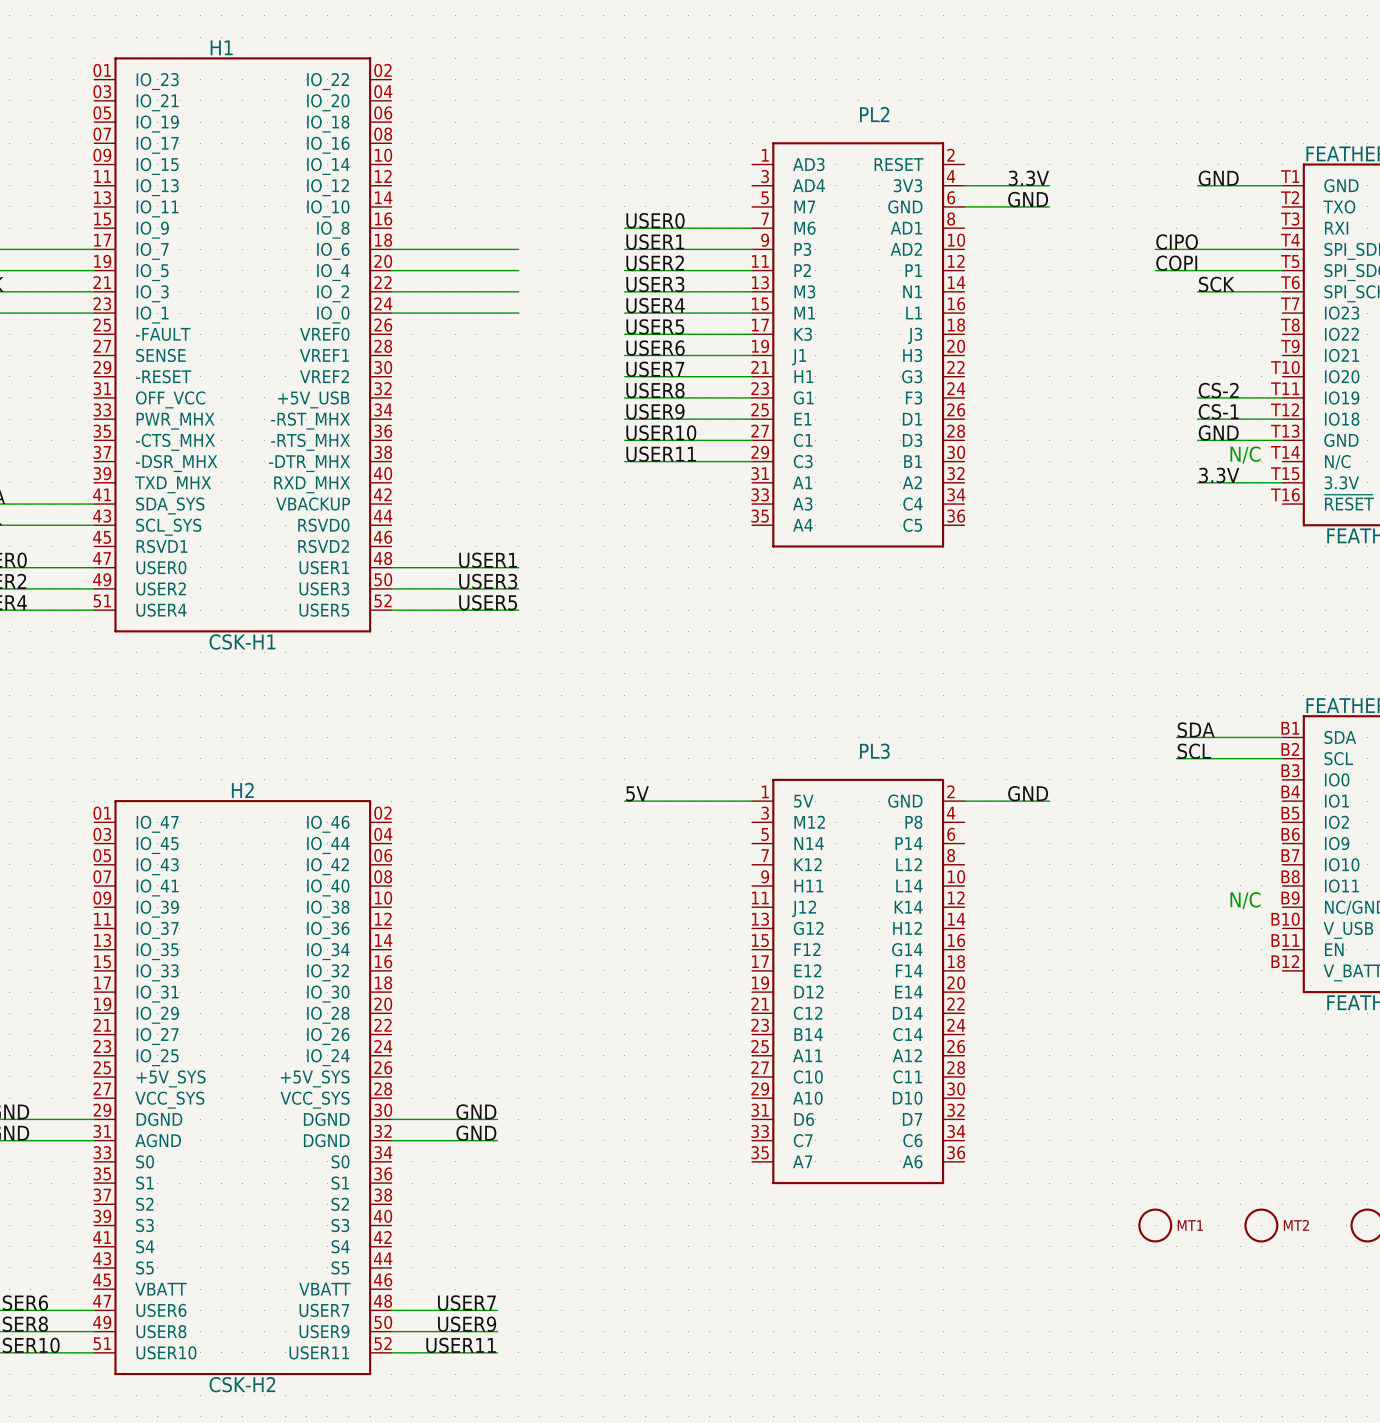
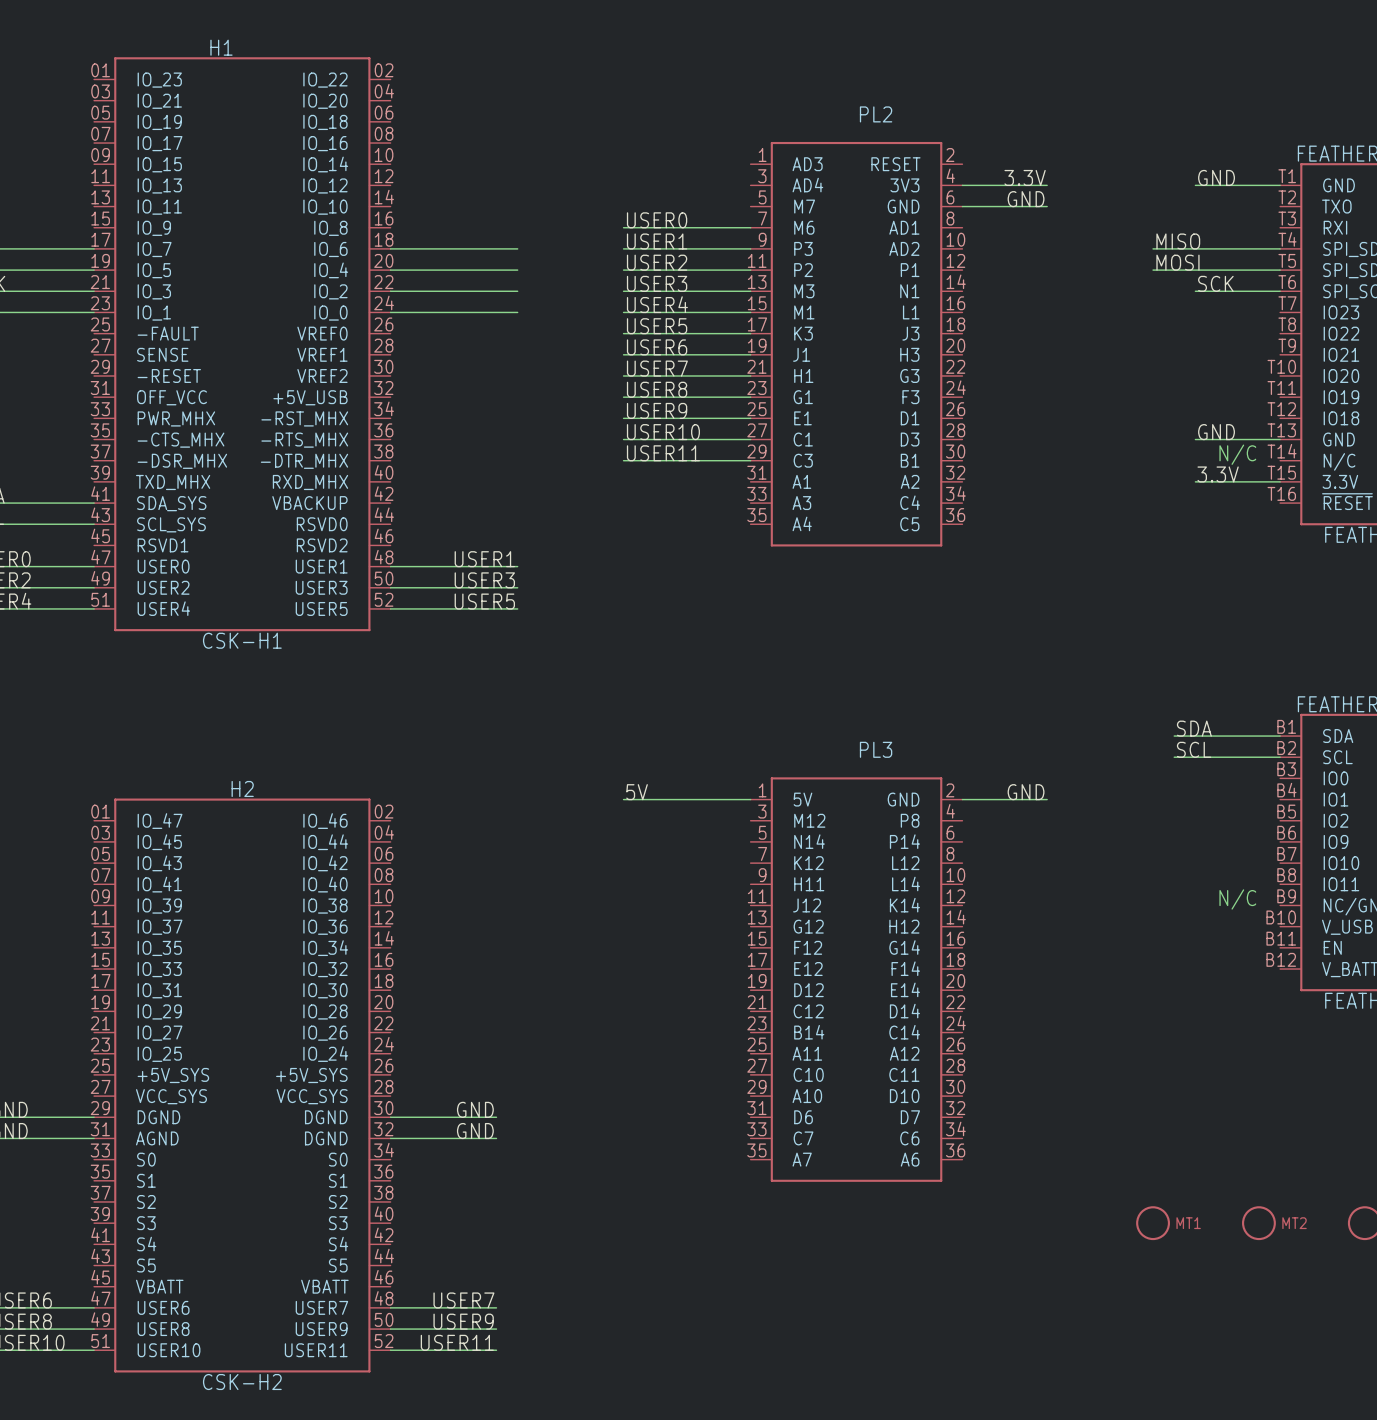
label: CIPO (1177, 241) -> MISO (1178, 241)
label: COPI (1176, 263) -> MOSI (1177, 262)
label: CS-2 (1218, 390) -> none
wire: (1197, 397) (1282, 397) -> none
label: CS-1 (1218, 411) -> none
wire: (1197, 419) (1282, 419) -> none

